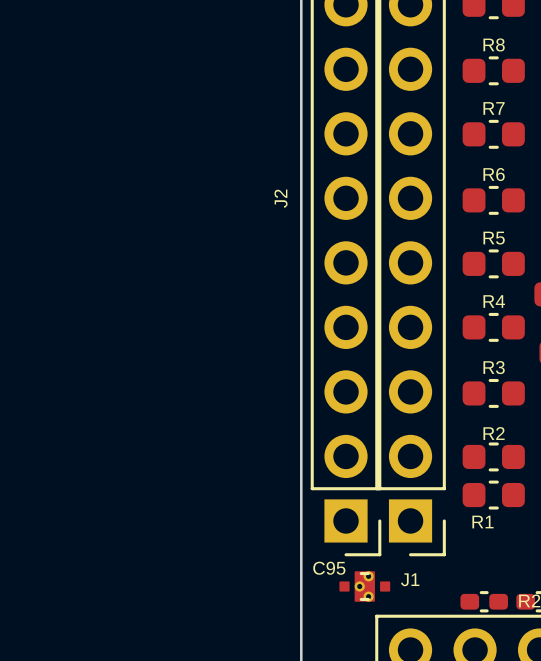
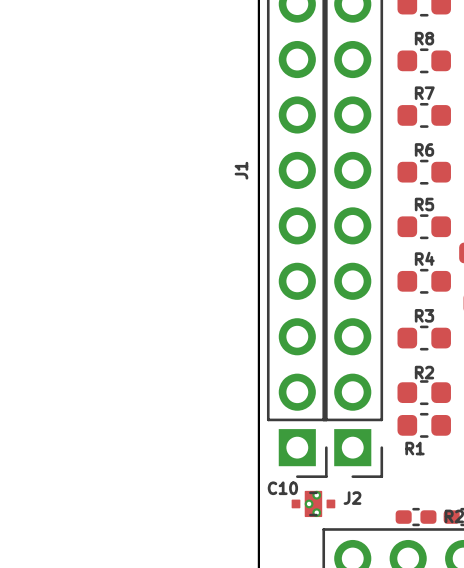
J2 name: J2 (281, 198) -> J1 (241, 170)
C95 name: C95 (329, 568) -> C10 (282, 488)
J1 name: J1 (410, 579) -> J2 (352, 498)

